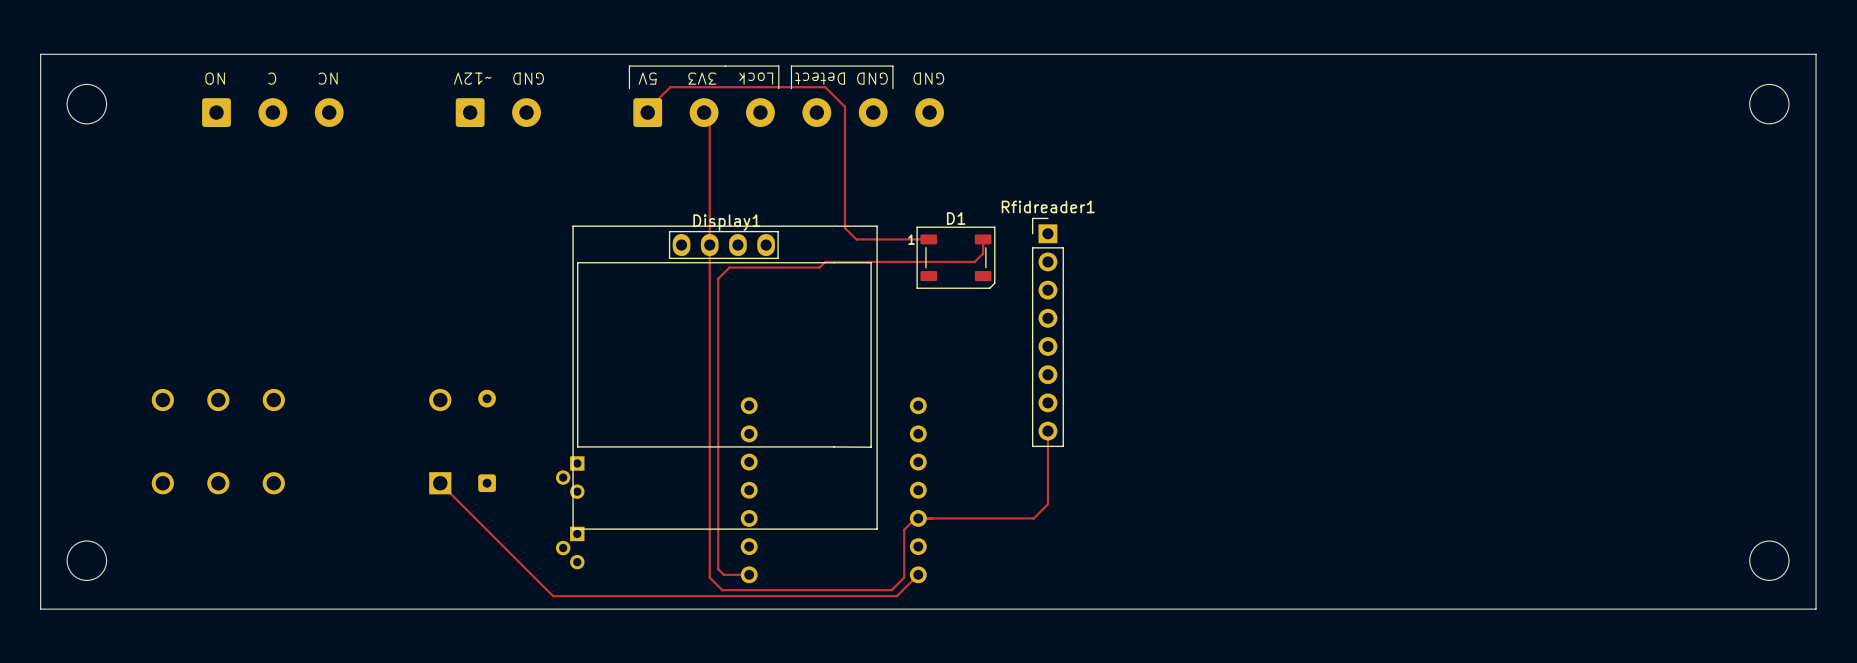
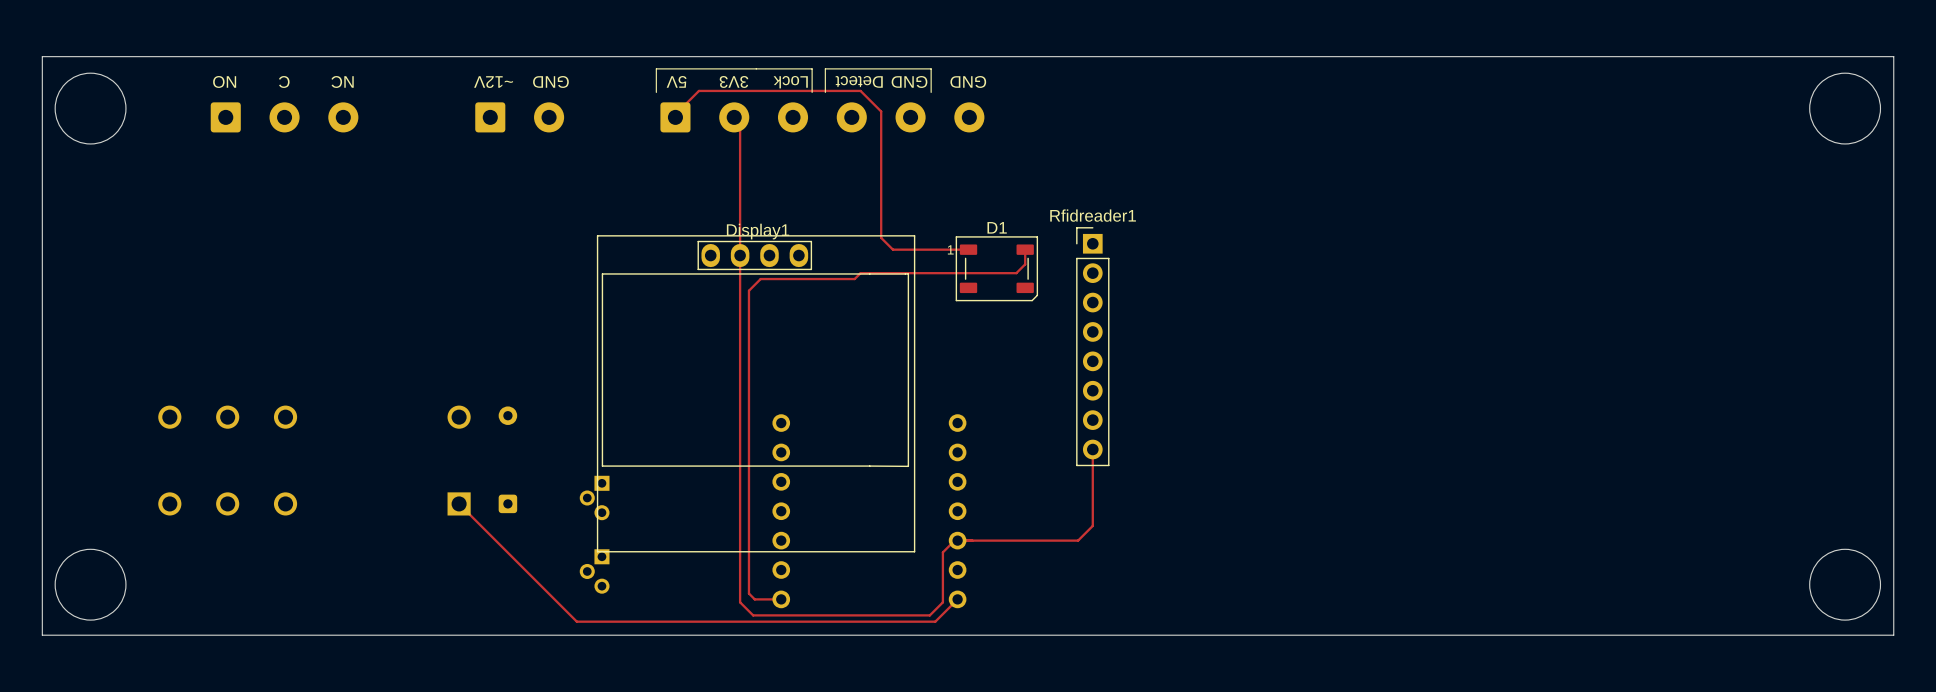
round board edge size: [66, 84, 107, 125] -> [54, 72, 127, 145]
round board edge size: [1749, 84, 1790, 125] -> [1809, 72, 1881, 145]
round board edge size: [66, 540, 107, 581] -> [54, 549, 127, 621]
round board edge size: [1749, 540, 1790, 581] -> [1809, 549, 1881, 621]

